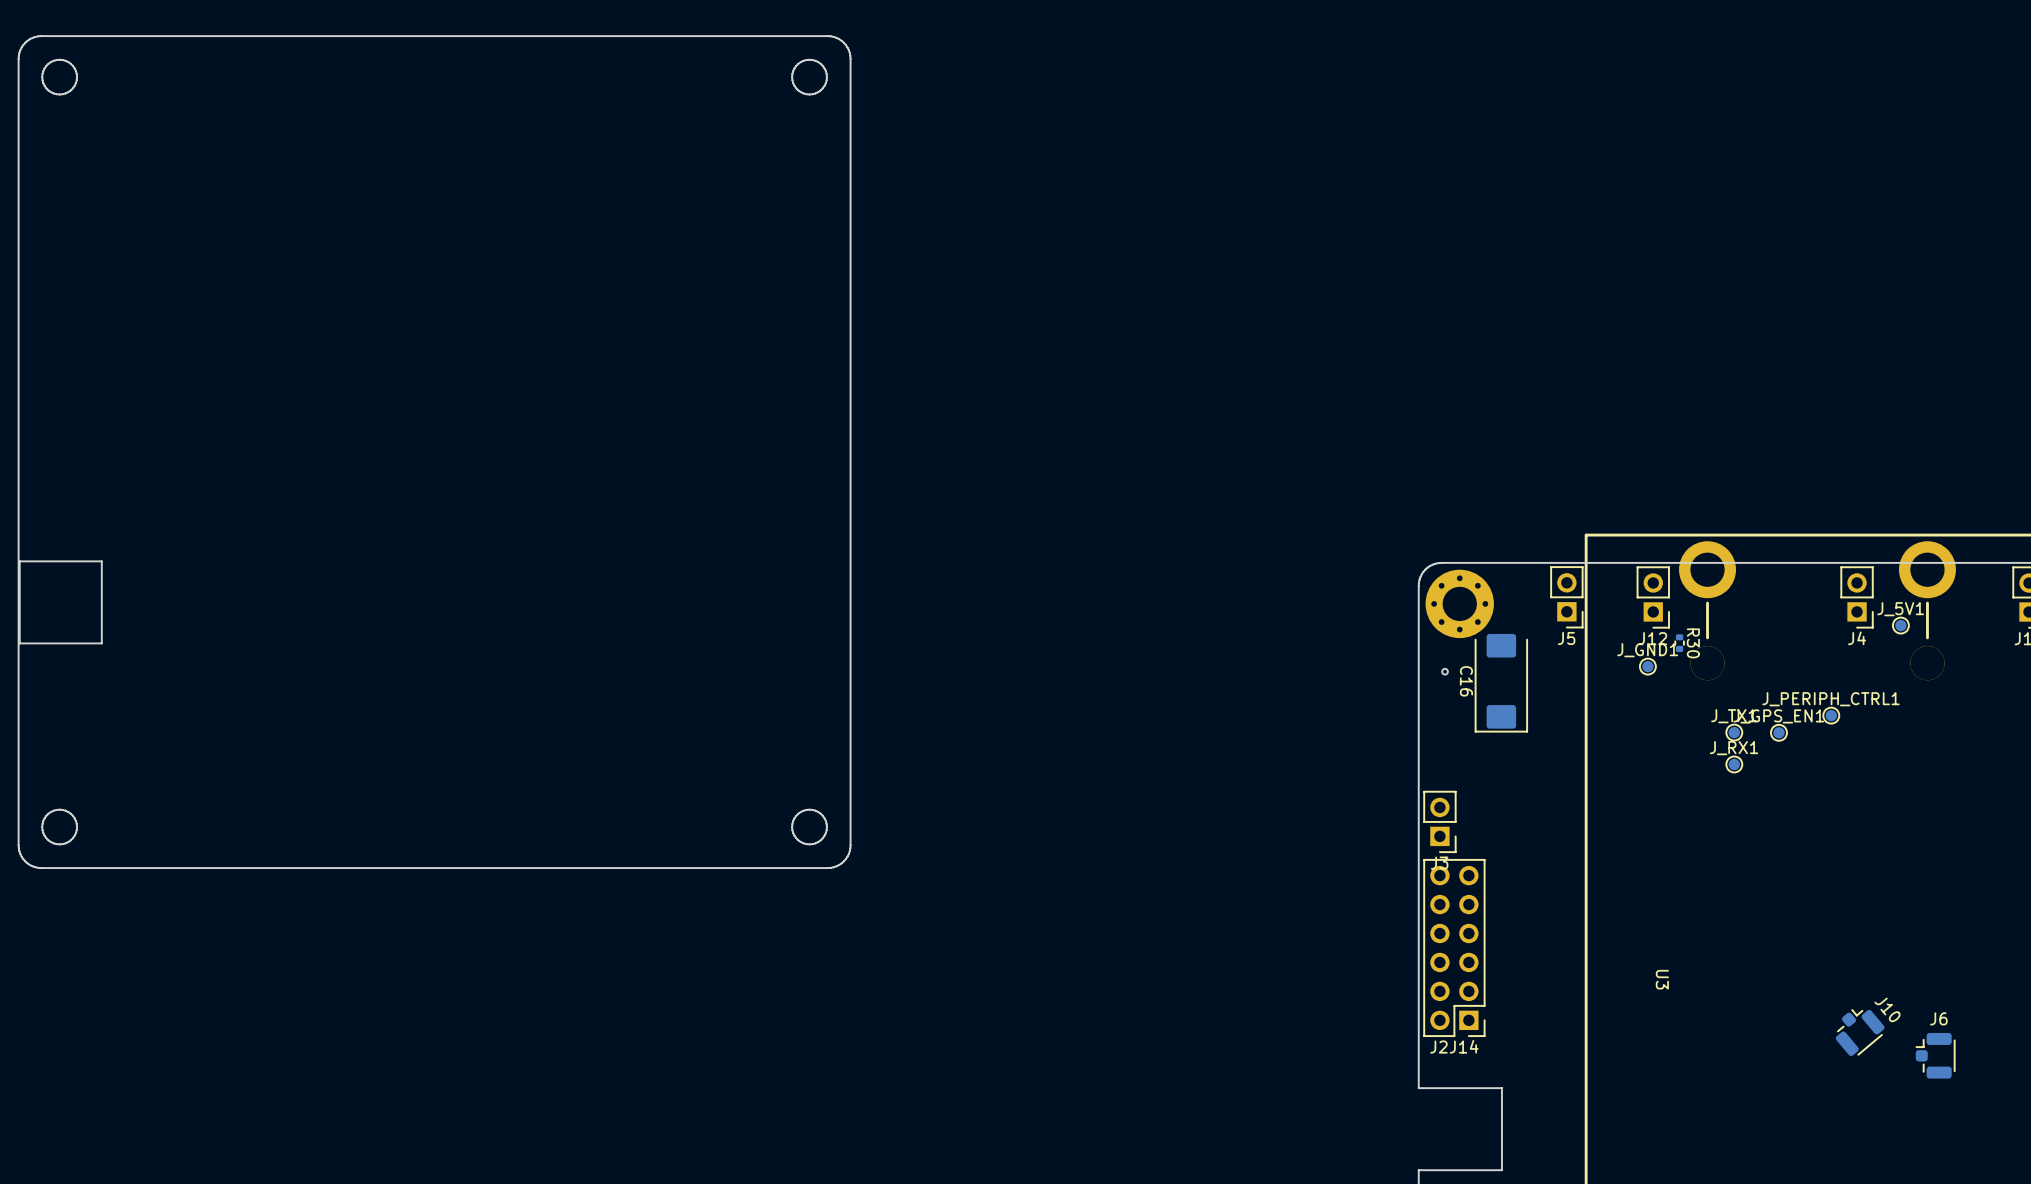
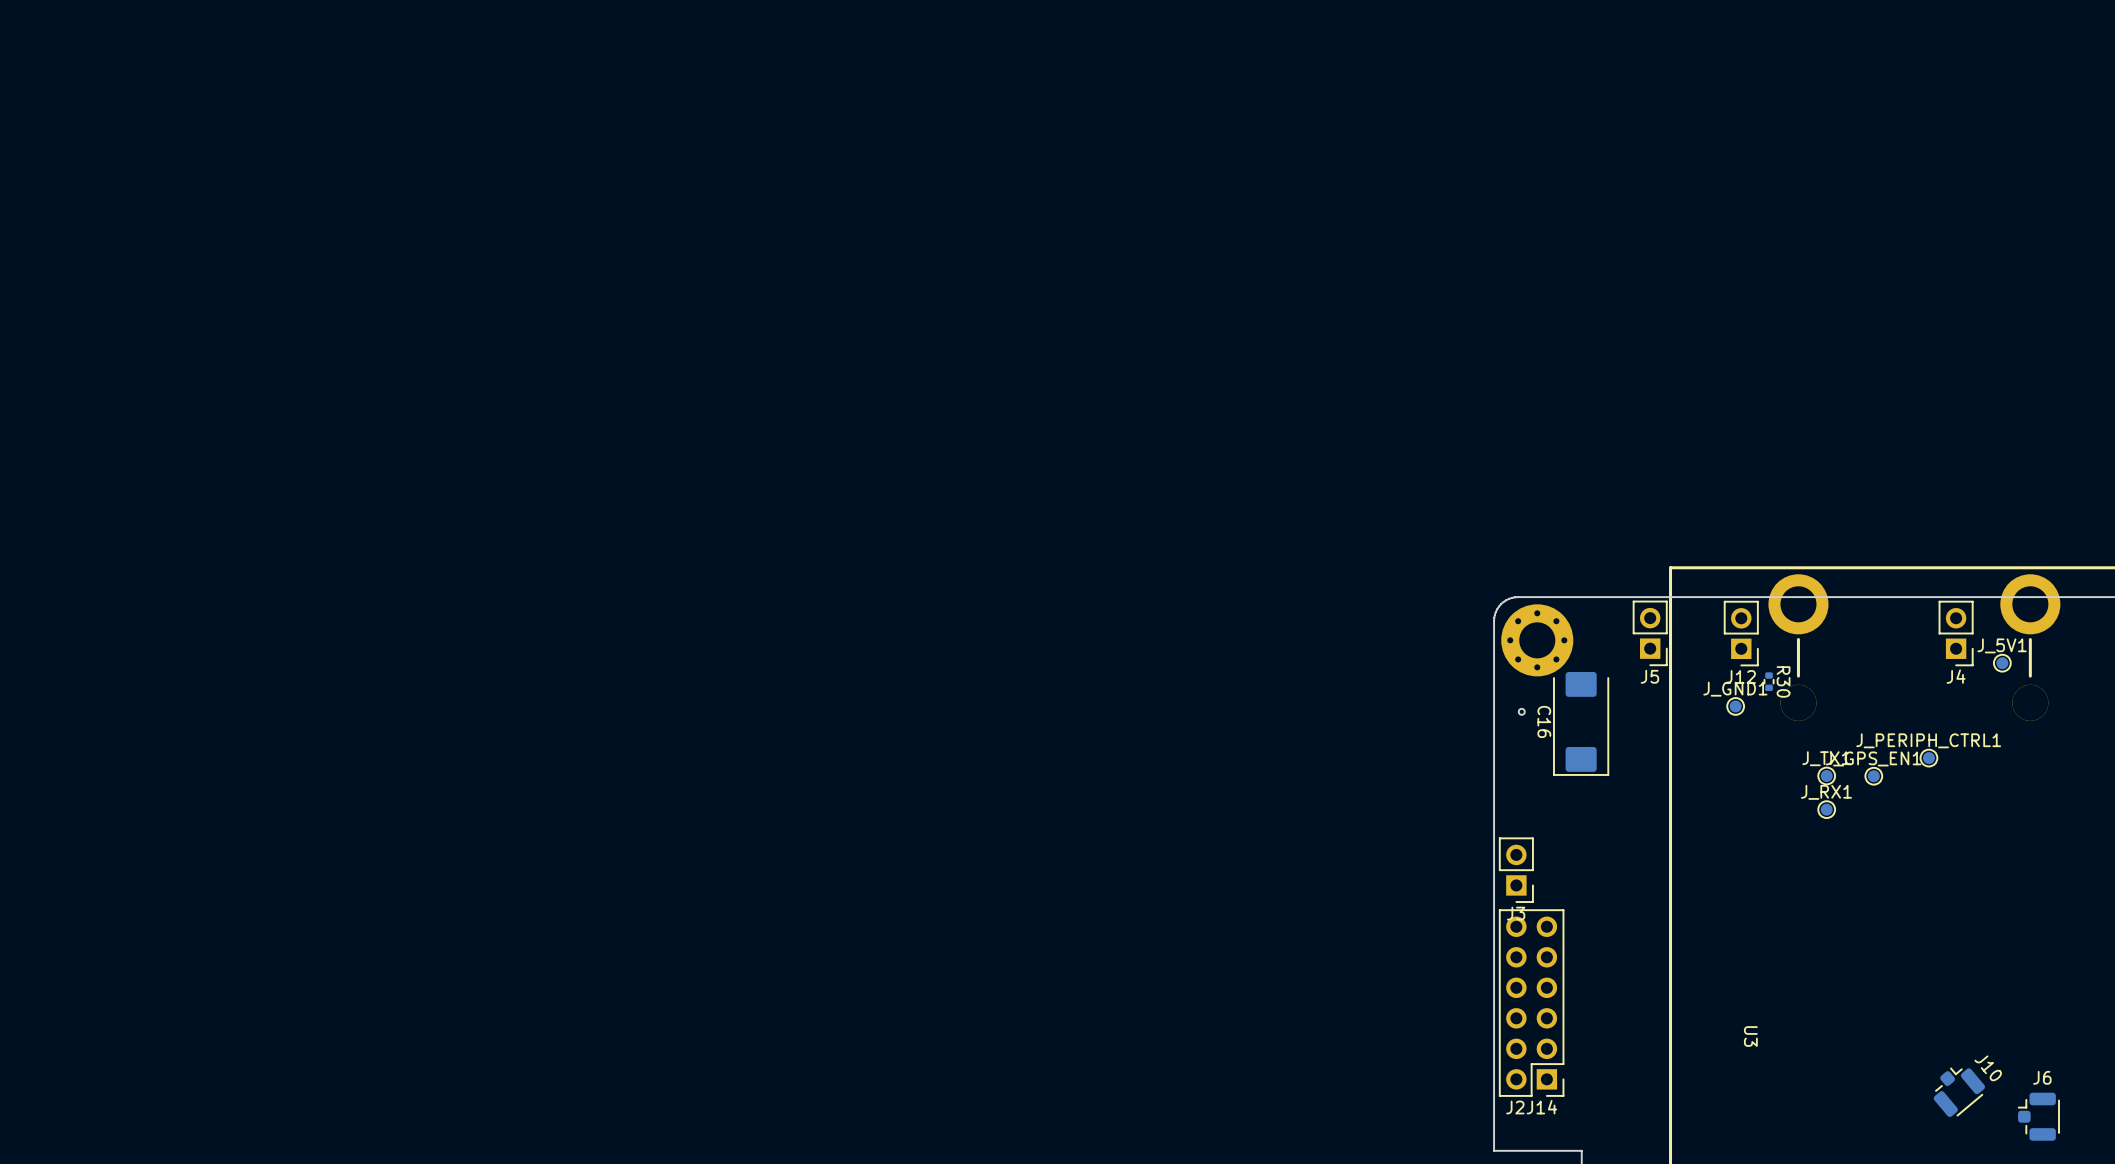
board edge: (827, 36) (836, 37) (843, 42) (848, 50) (850, 58) (850, 845) (848, 853) (843, 861) (836, 866) (827, 868) (41, 868) (32, 866) (25, 861) (20, 853) (18, 845) (18, 58) (20, 50) (25, 42) (32, 37) (41, 36) (827, 36) -> none
board edge: (59, 59) (68, 62) (72, 65) (77, 77) (74, 85) (70, 90) (59, 94) (48, 90) (44, 85) (42, 77) (46, 65) (53, 60) (59, 59) -> none
board edge: (809, 59) (818, 62) (822, 65) (826, 77) (825, 83) (820, 90) (809, 94) (798, 90) (794, 85) (792, 77) (796, 65) (803, 60) (809, 59) -> none
board edge: (101, 561) (101, 643) (19, 643) (19, 561) (101, 561) -> none
board edge: (59, 809) (68, 811) (72, 815) (77, 827) (74, 835) (70, 840) (59, 844) (48, 840) (44, 835) (42, 827) (46, 815) (53, 810) (59, 809) -> none
board edge: (809, 809) (818, 811) (822, 815) (826, 827) (825, 832) (820, 840) (809, 844) (798, 840) (794, 835) (792, 827) (796, 815) (803, 810) (809, 809) -> none

